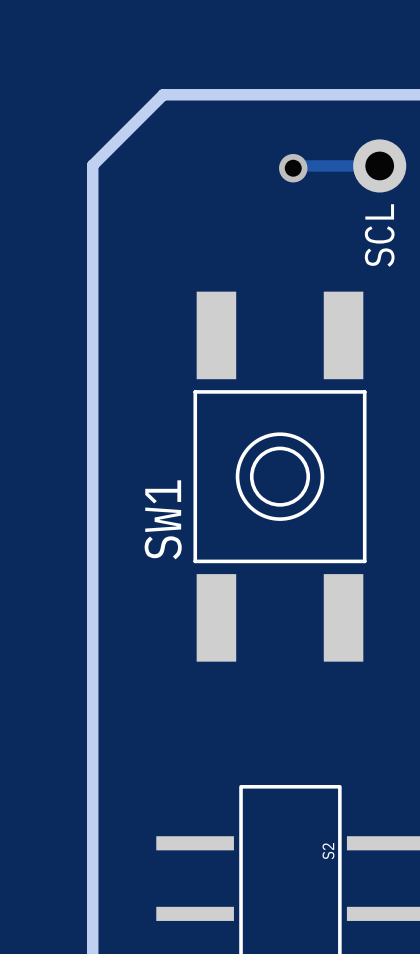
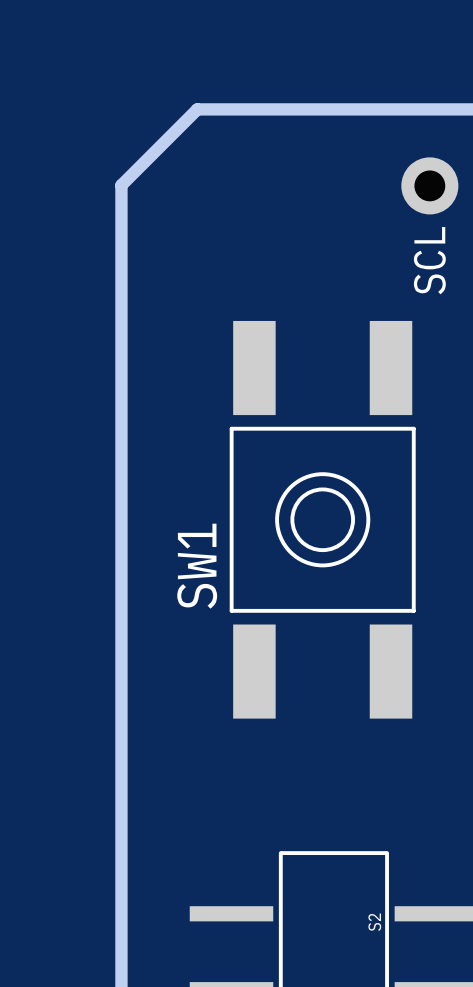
track: (379, 165) (295, 165) (293, 168) -> none
via: (293, 168) -> none

